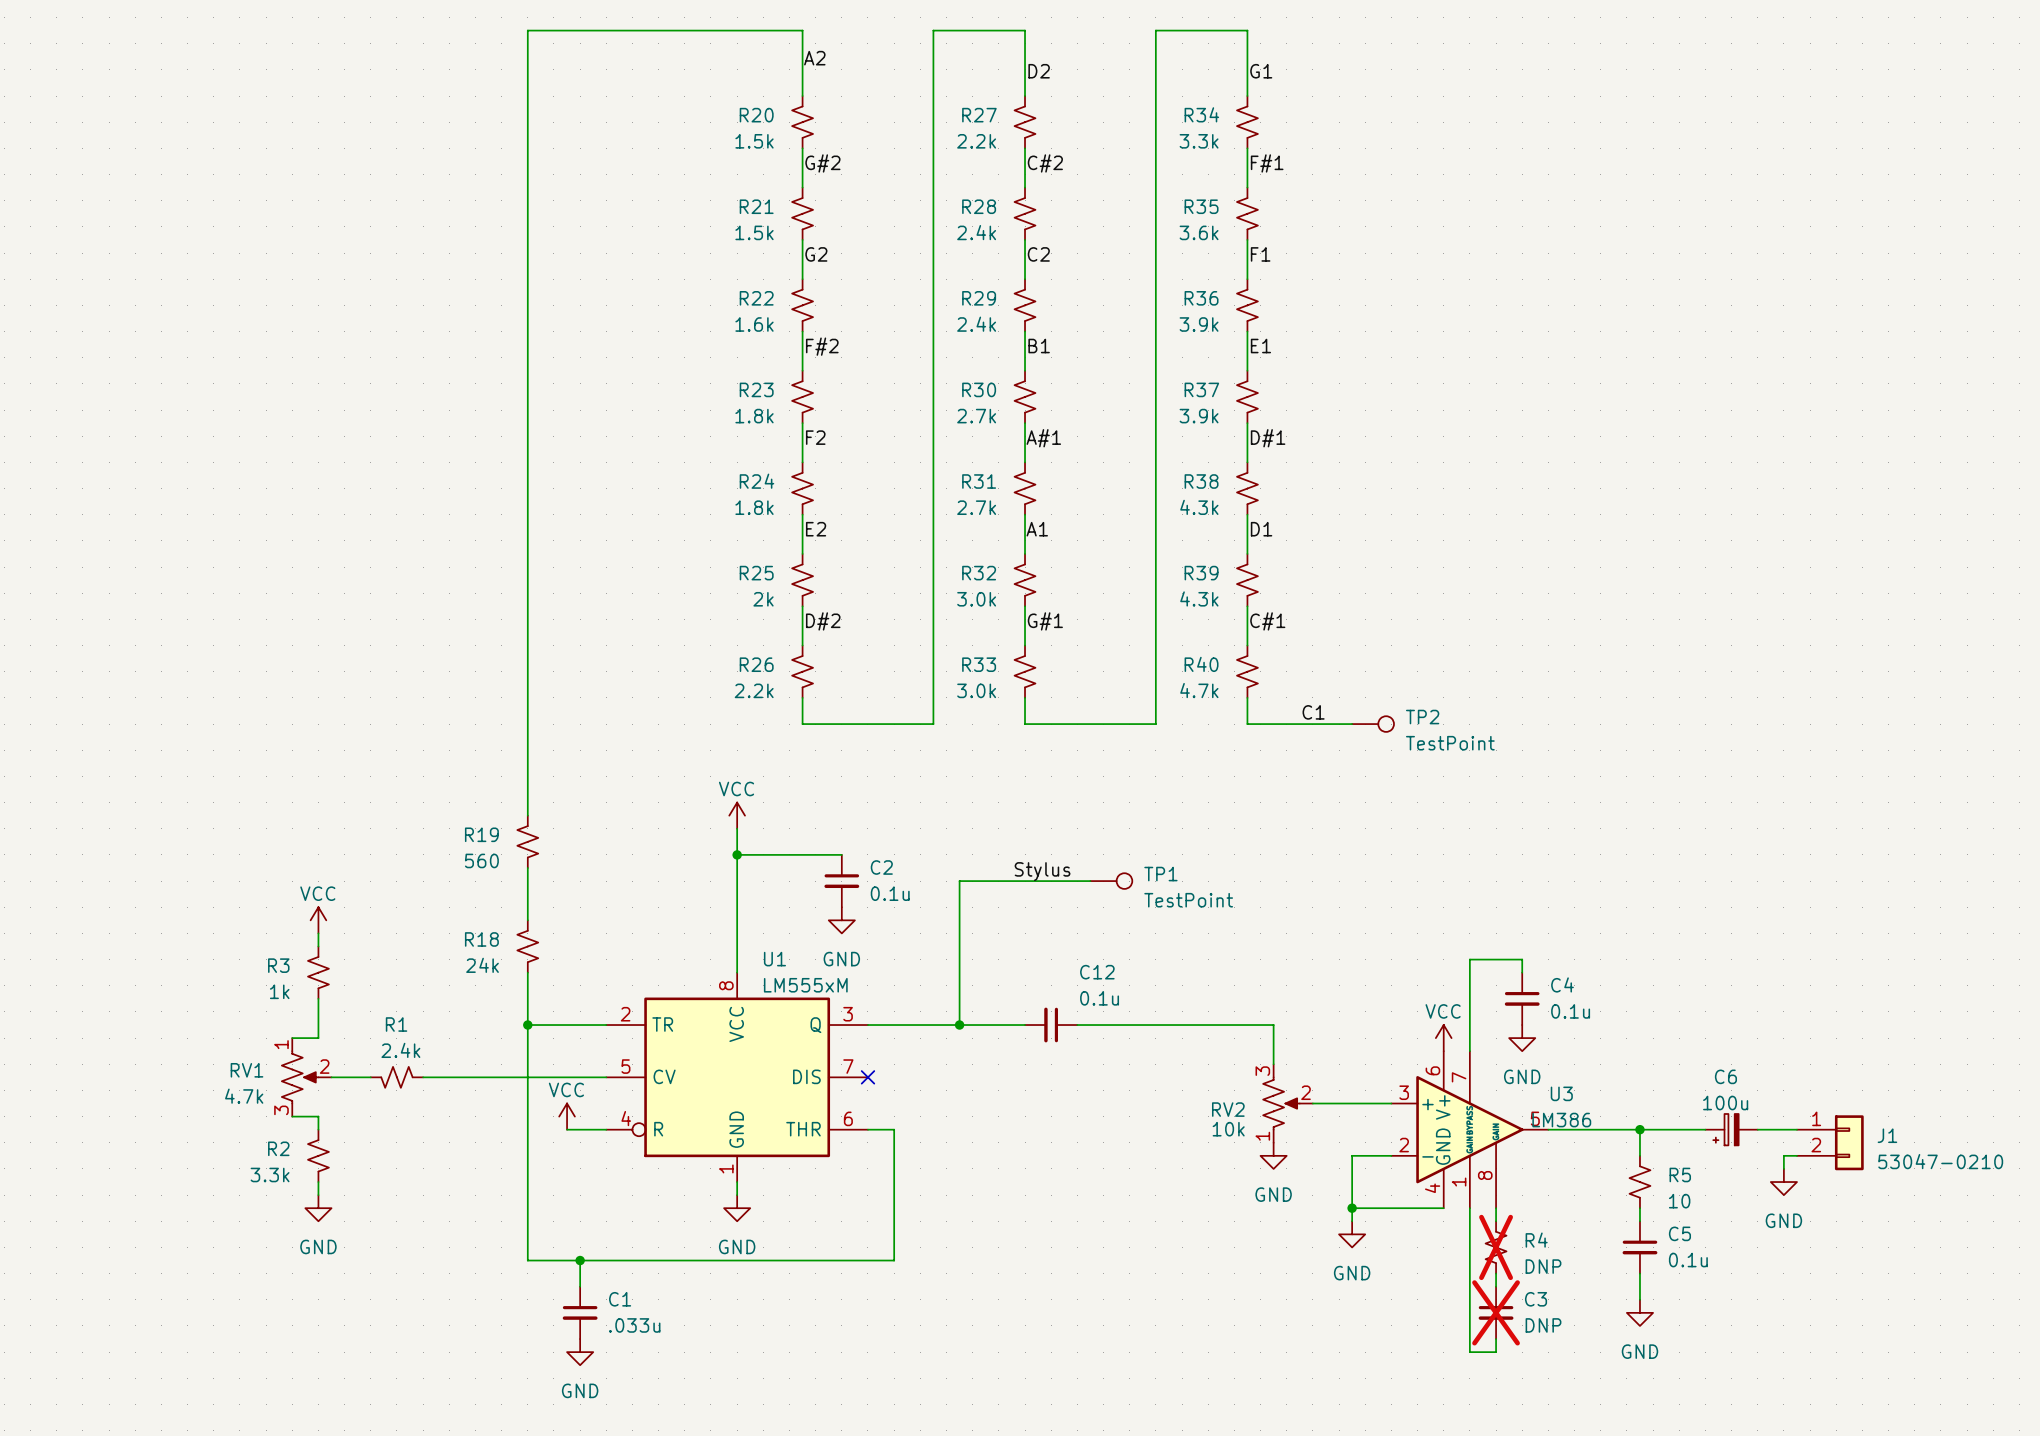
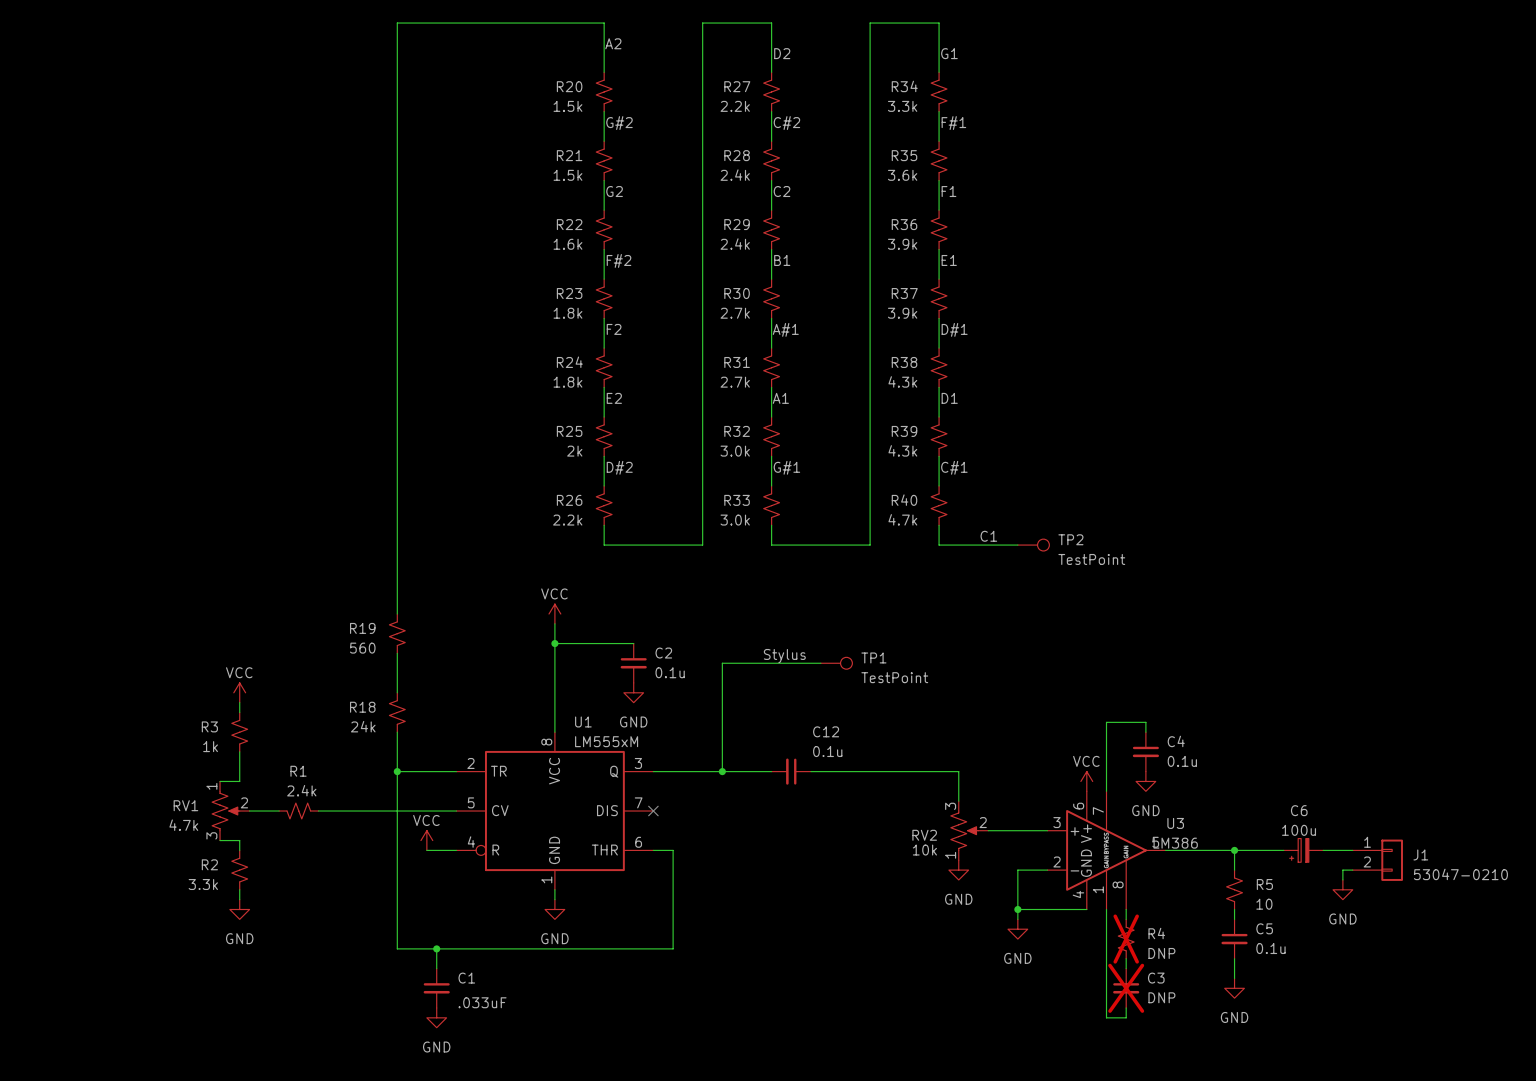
C1 value: .033u (634, 1325) -> .033uF (482, 1002)

